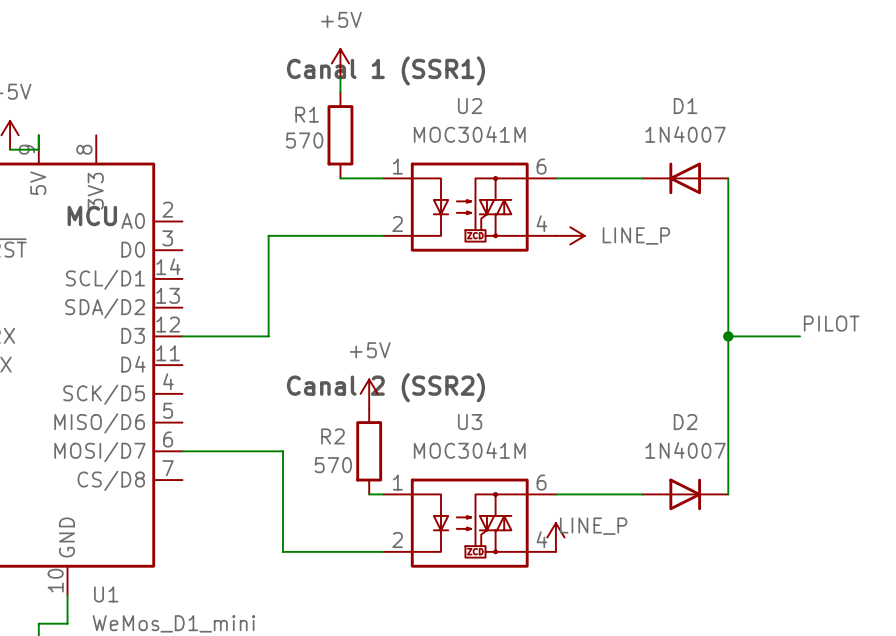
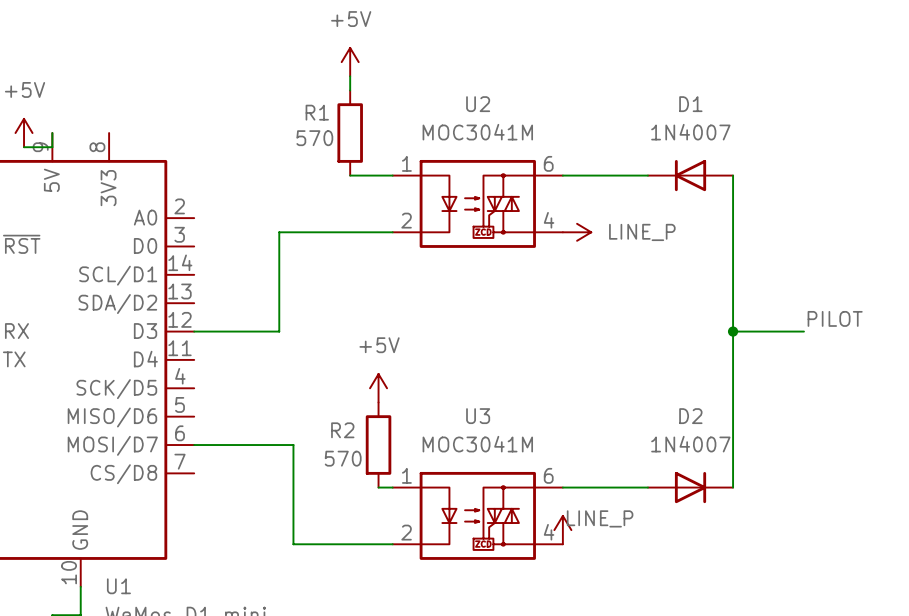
text: Canal 1 (SSR1) (385, 70) -> none
text: MCU (92, 215) -> none
text: Canal 2 (SSR2) (385, 387) -> none

